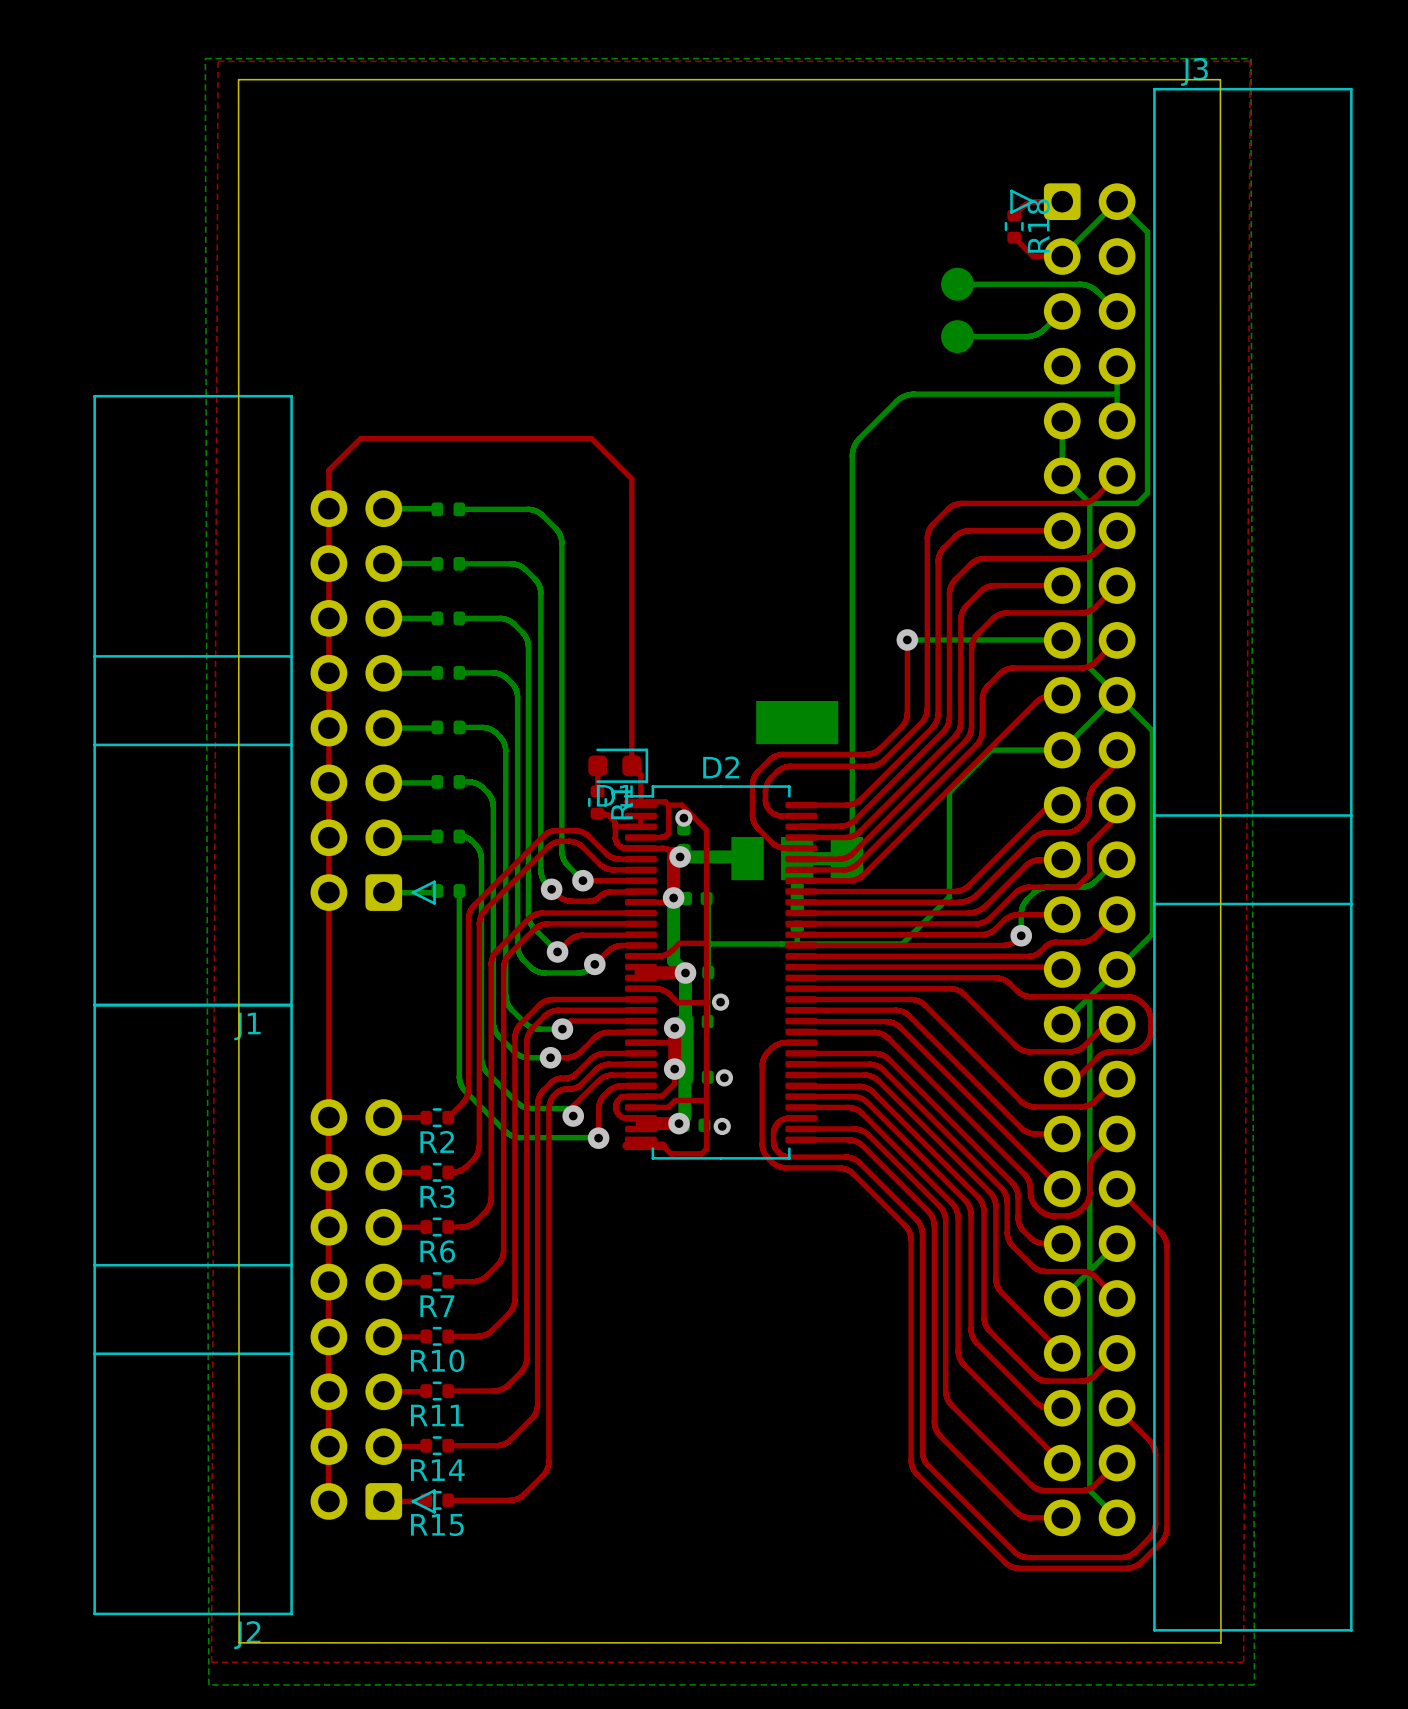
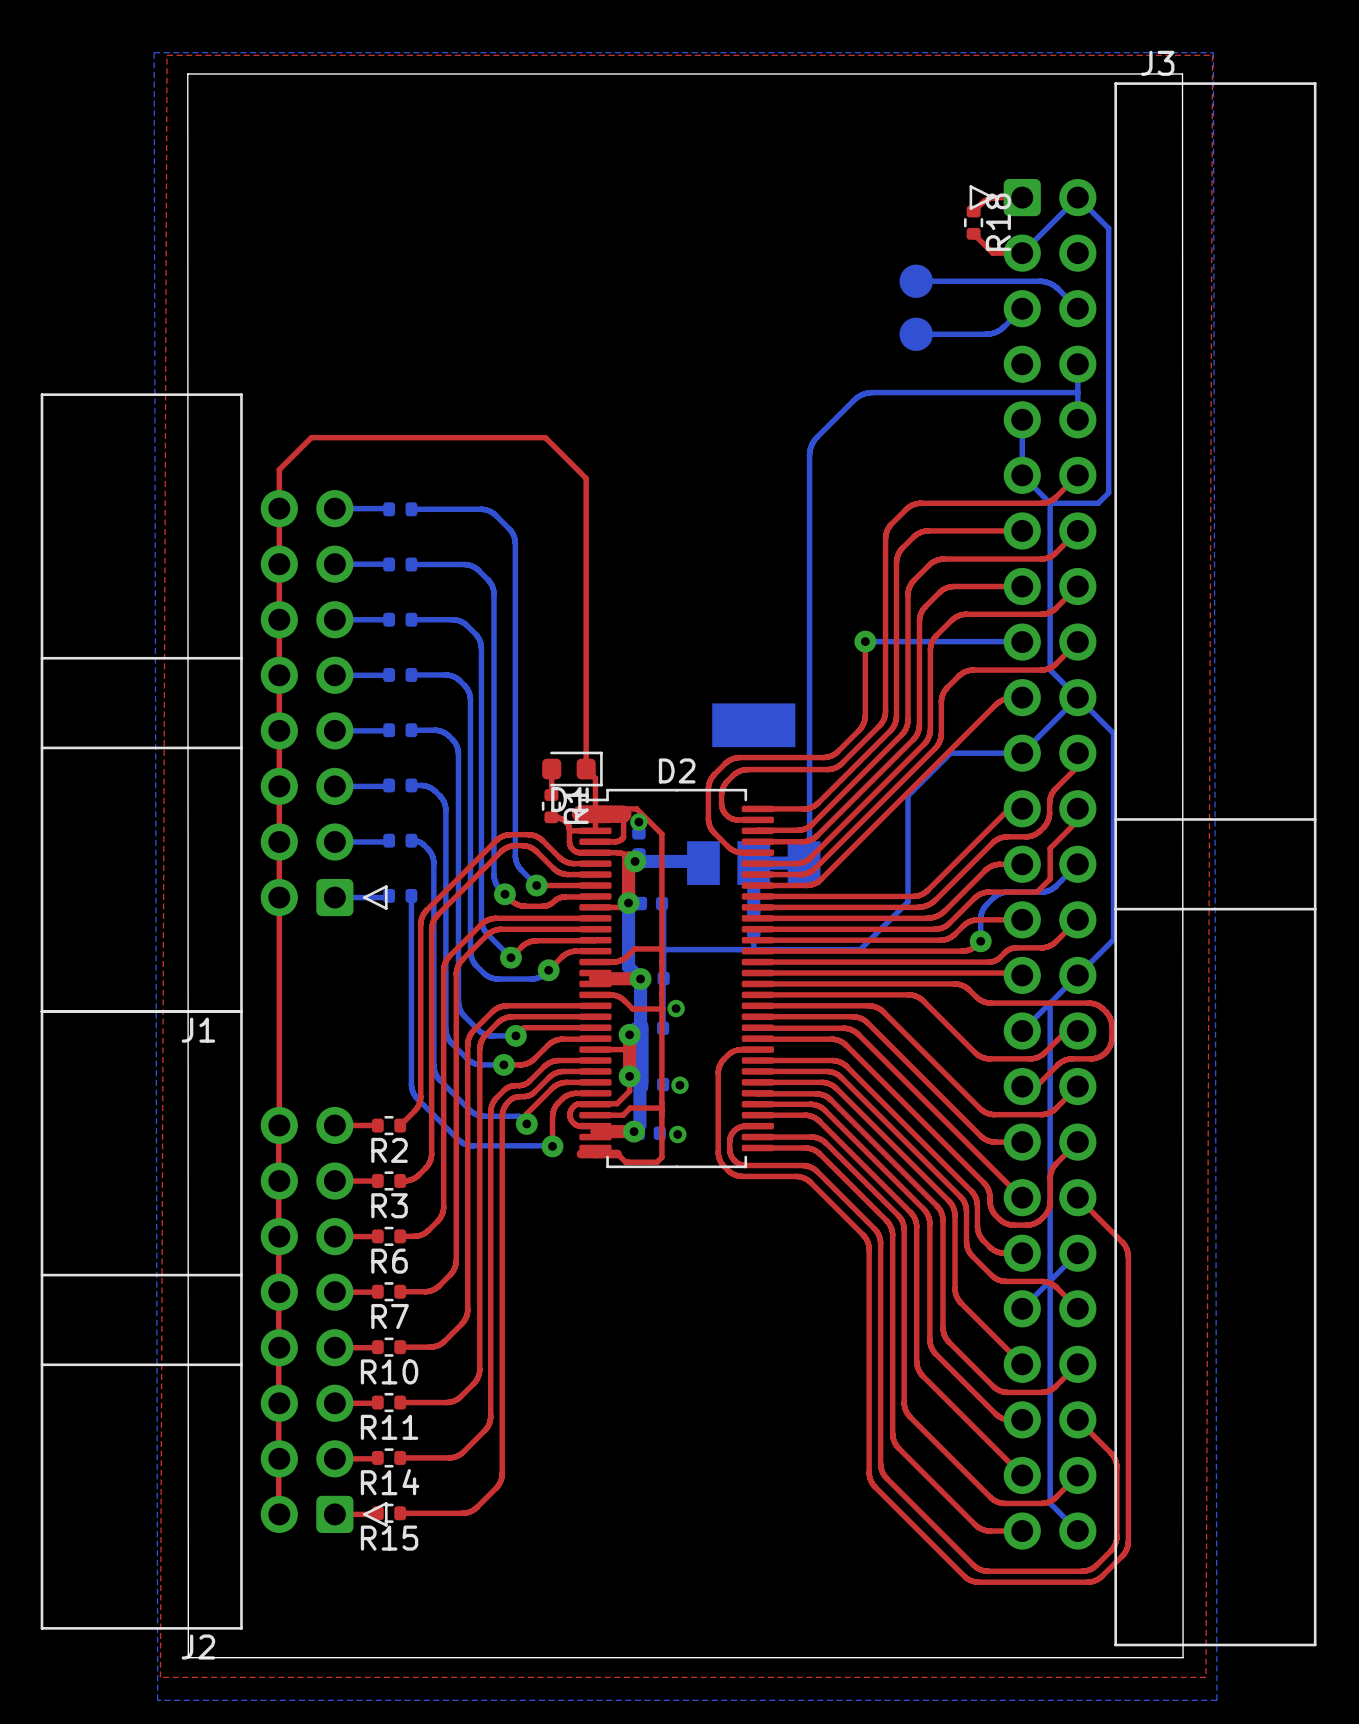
top track: (626, 801) (665, 801) (668, 805) -> none
top track: none -> (623, 813) (580, 814)

